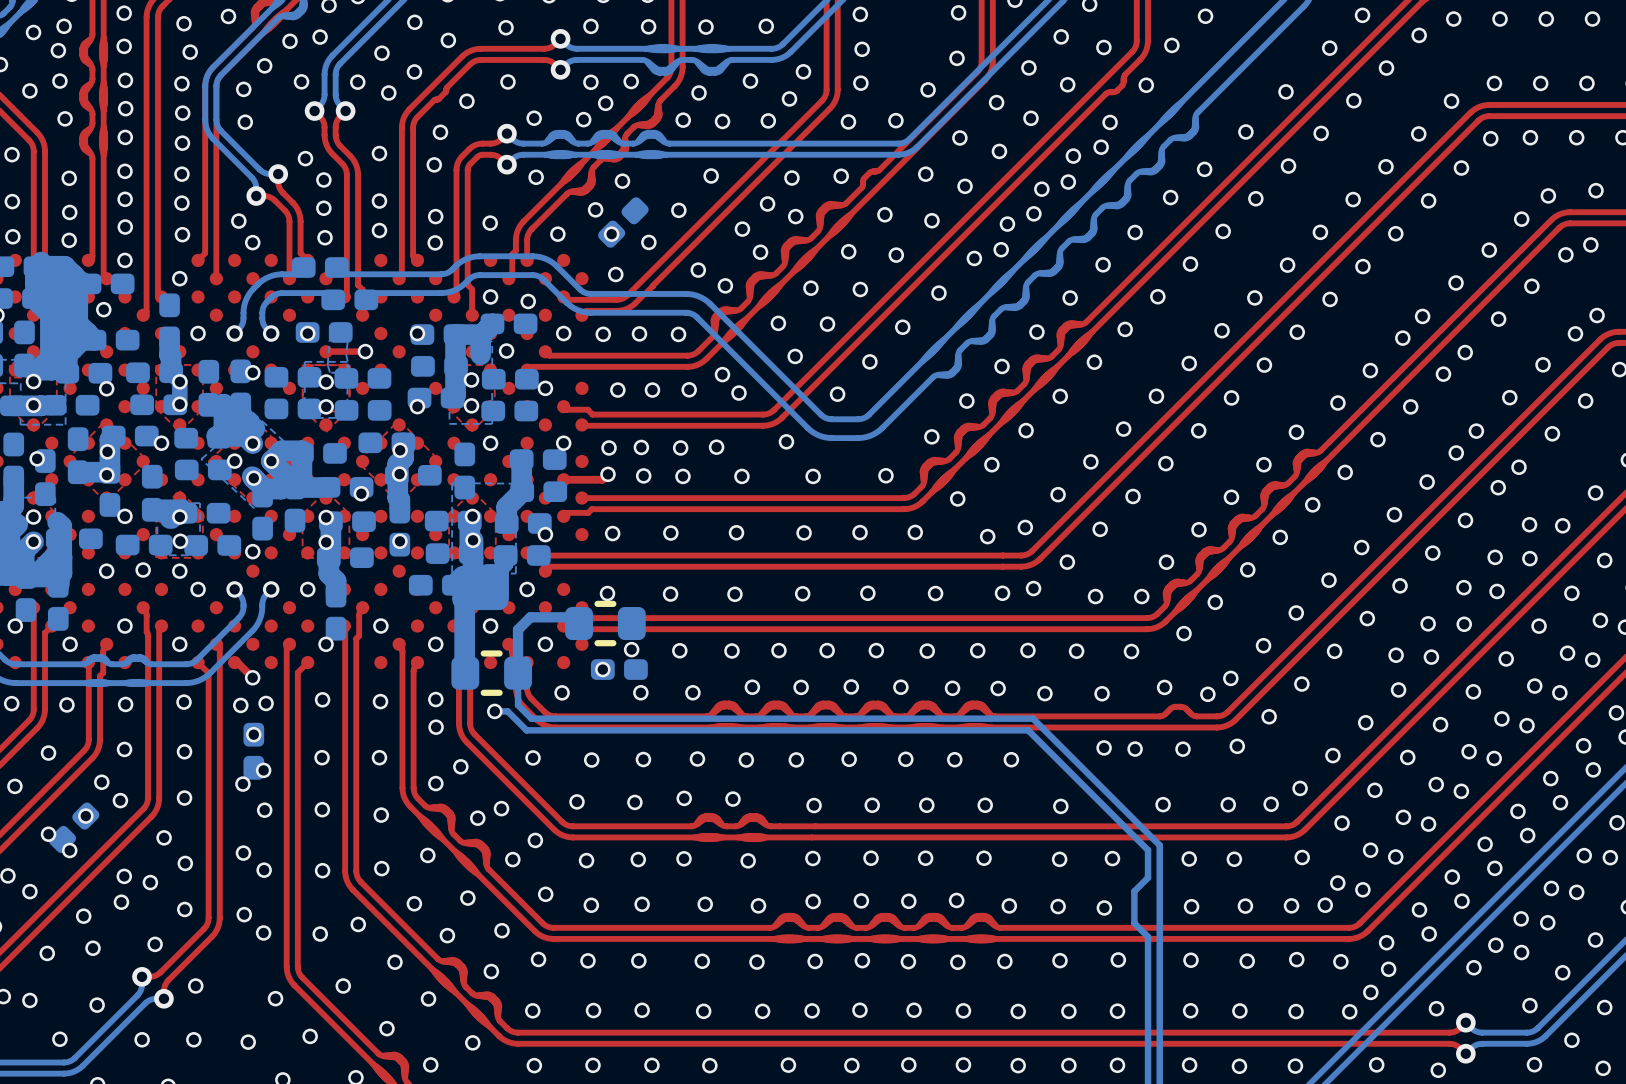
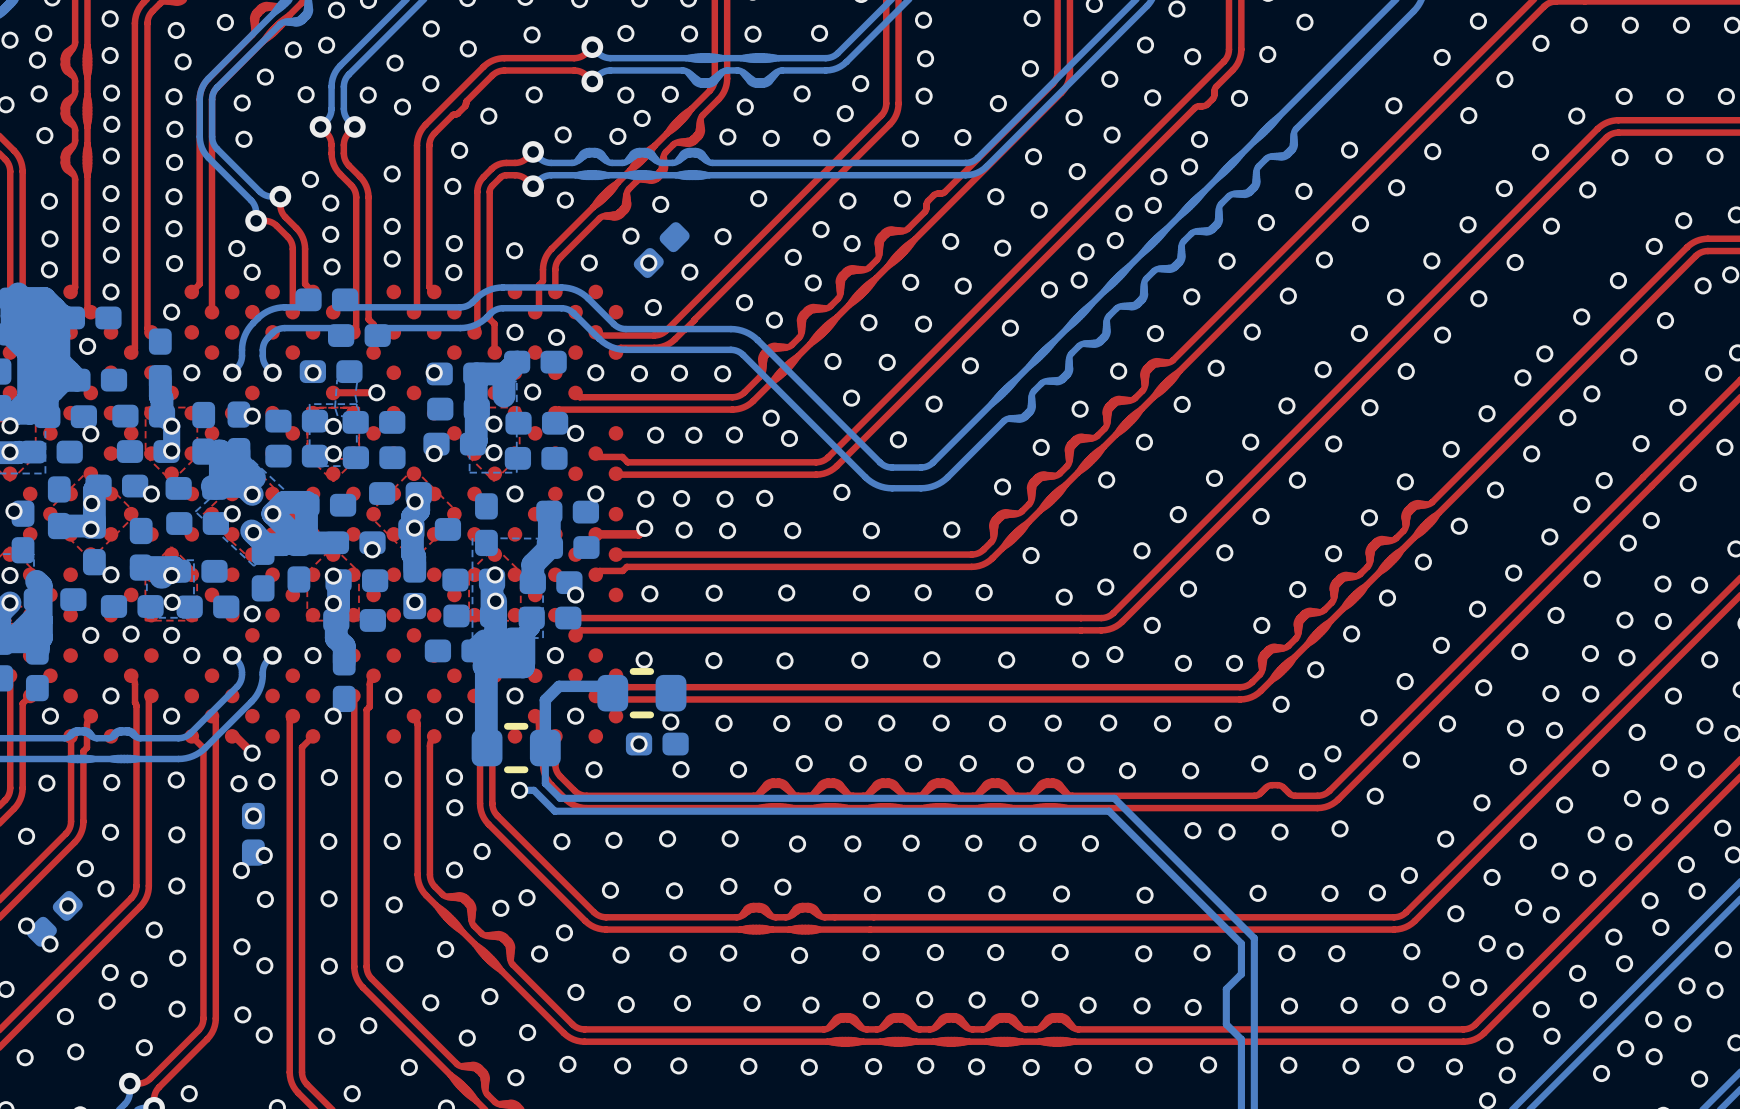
via position: (697, 758) -> (730, 838)
via position: (643, 759) -> (667, 838)
via position: (591, 760) -> (613, 840)

